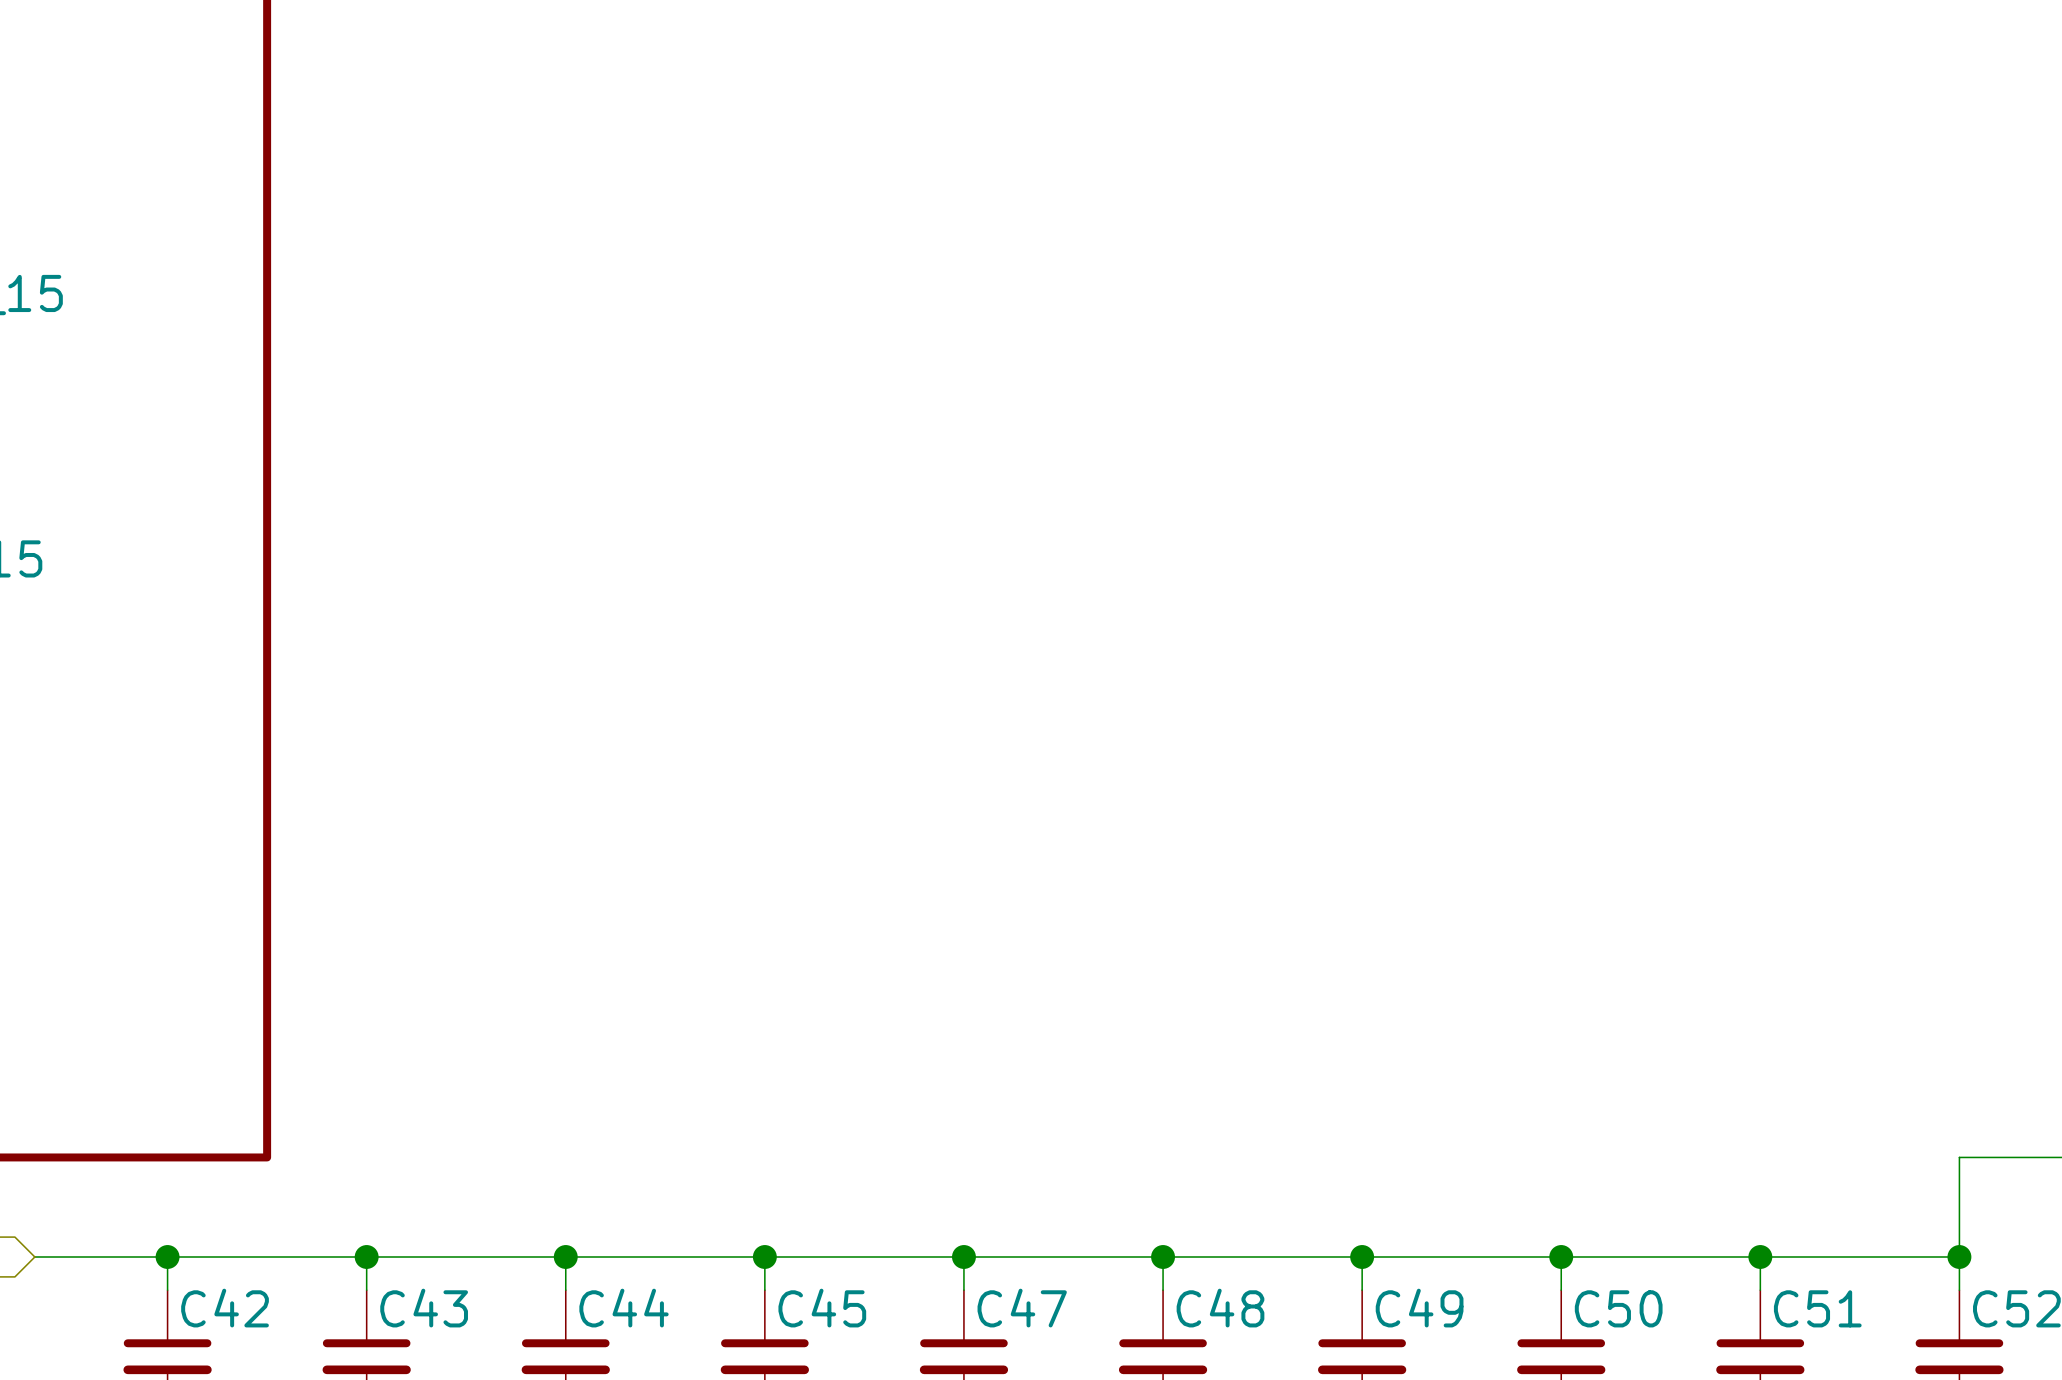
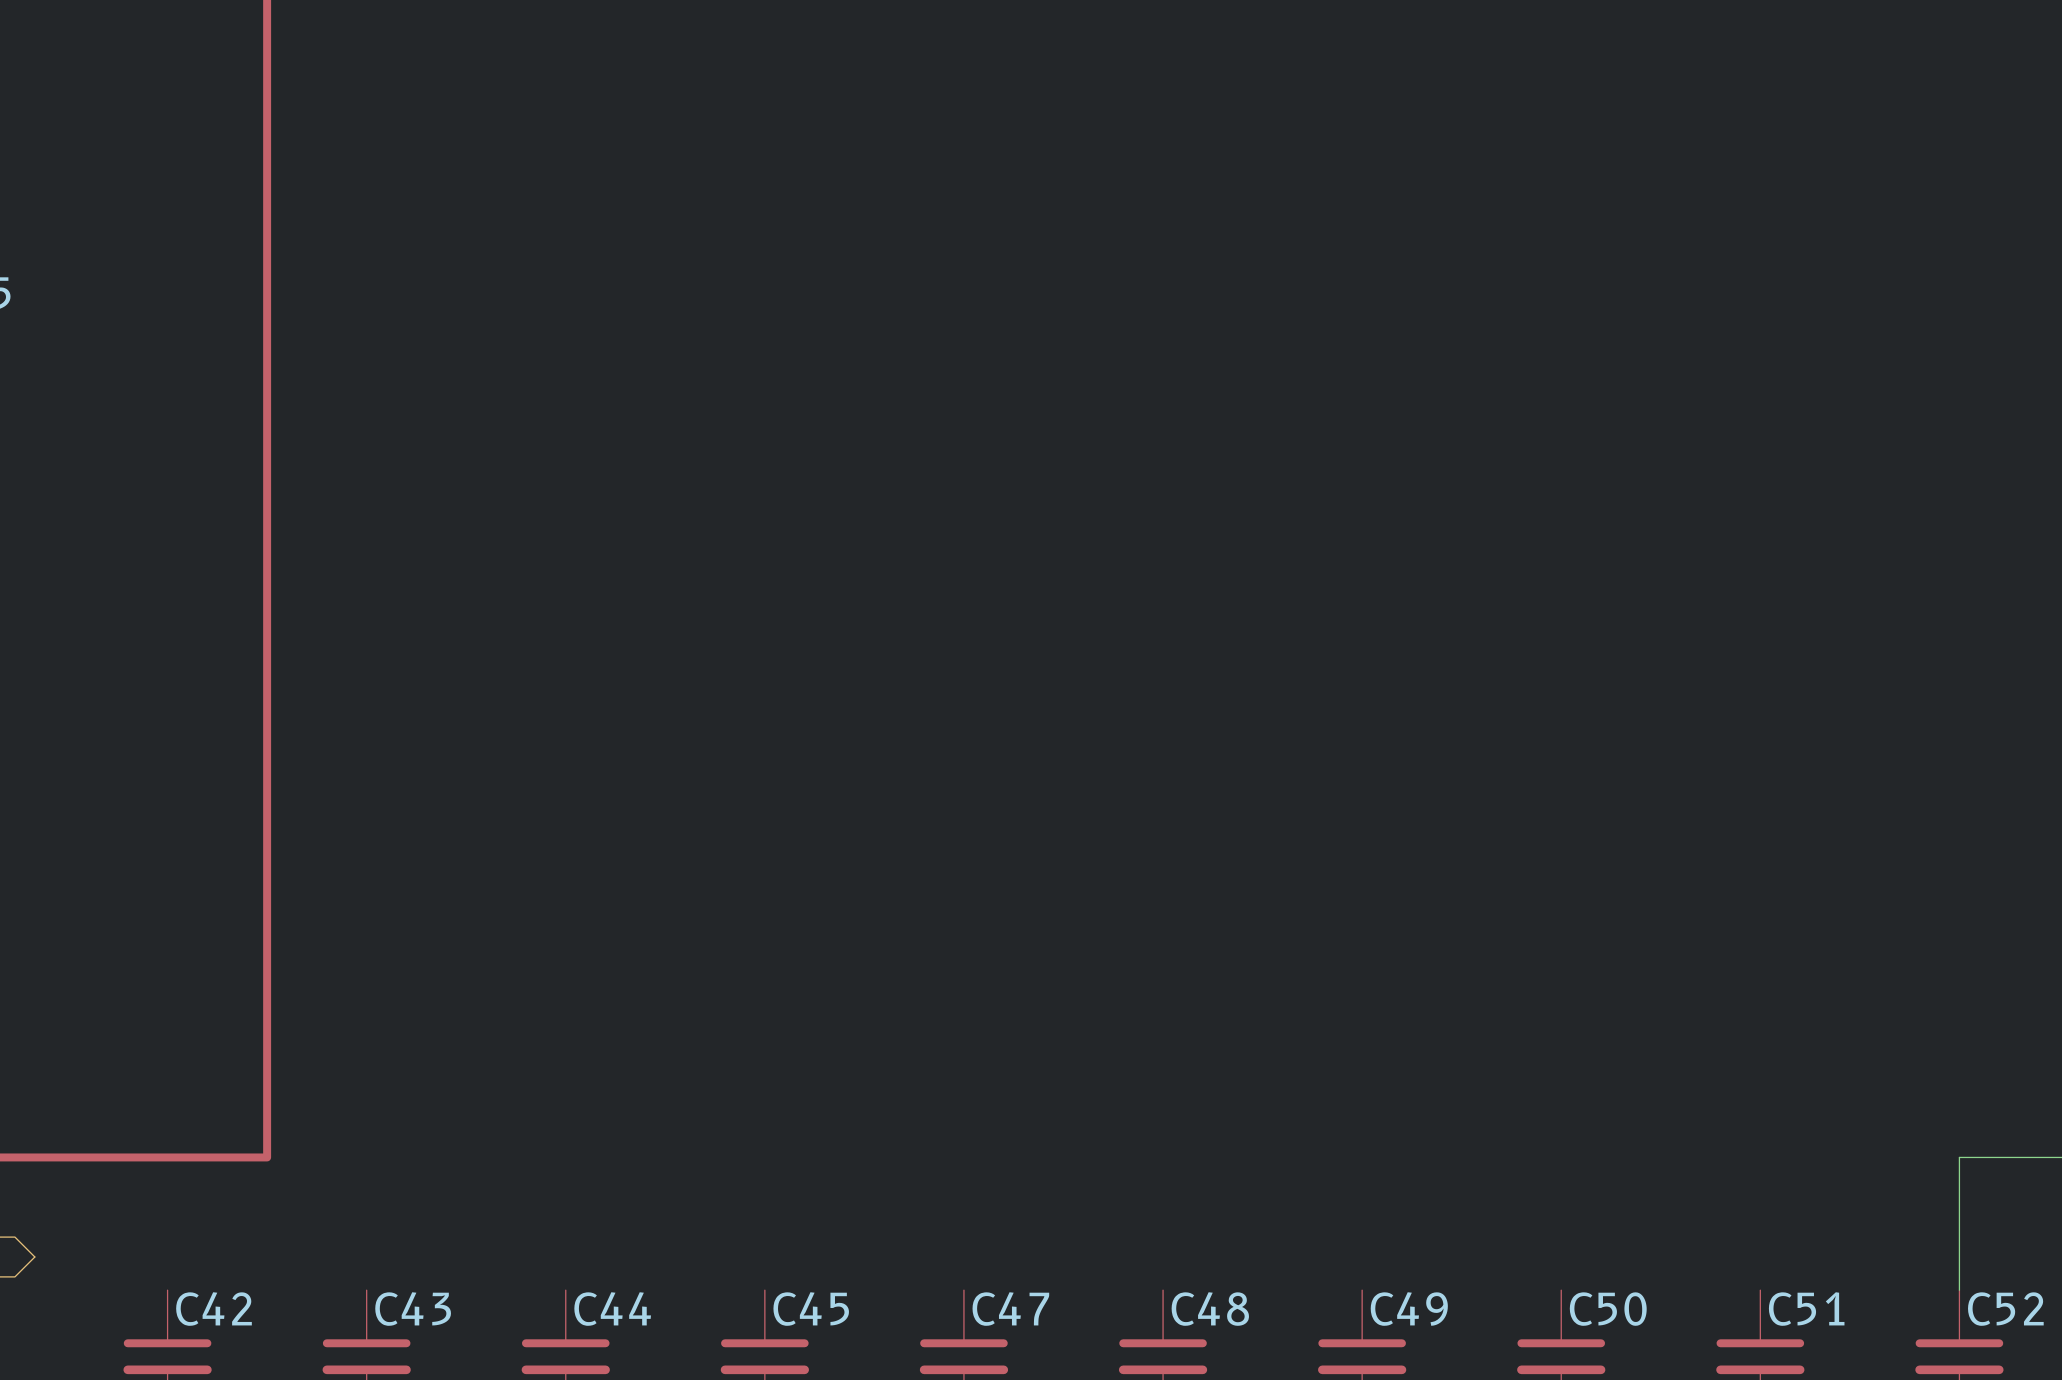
wire: (34, 1257) (1959, 1257) -> none
wire: (167, 1257) (167, 1290) -> none
junction: (167, 1257) -> none
wire: (366, 1257) (366, 1290) -> none
junction: (366, 1257) -> none
wire: (565, 1257) (565, 1290) -> none
junction: (565, 1257) -> none
wire: (764, 1257) (764, 1290) -> none
junction: (764, 1257) -> none
wire: (963, 1257) (963, 1290) -> none
junction: (963, 1257) -> none
wire: (1163, 1257) (1163, 1290) -> none
junction: (1163, 1257) -> none
wire: (1362, 1257) (1362, 1290) -> none
junction: (1362, 1257) -> none
wire: (1561, 1257) (1561, 1290) -> none
junction: (1561, 1257) -> none
wire: (1760, 1257) (1760, 1290) -> none
junction: (1760, 1257) -> none
junction: (1959, 1257) -> none

